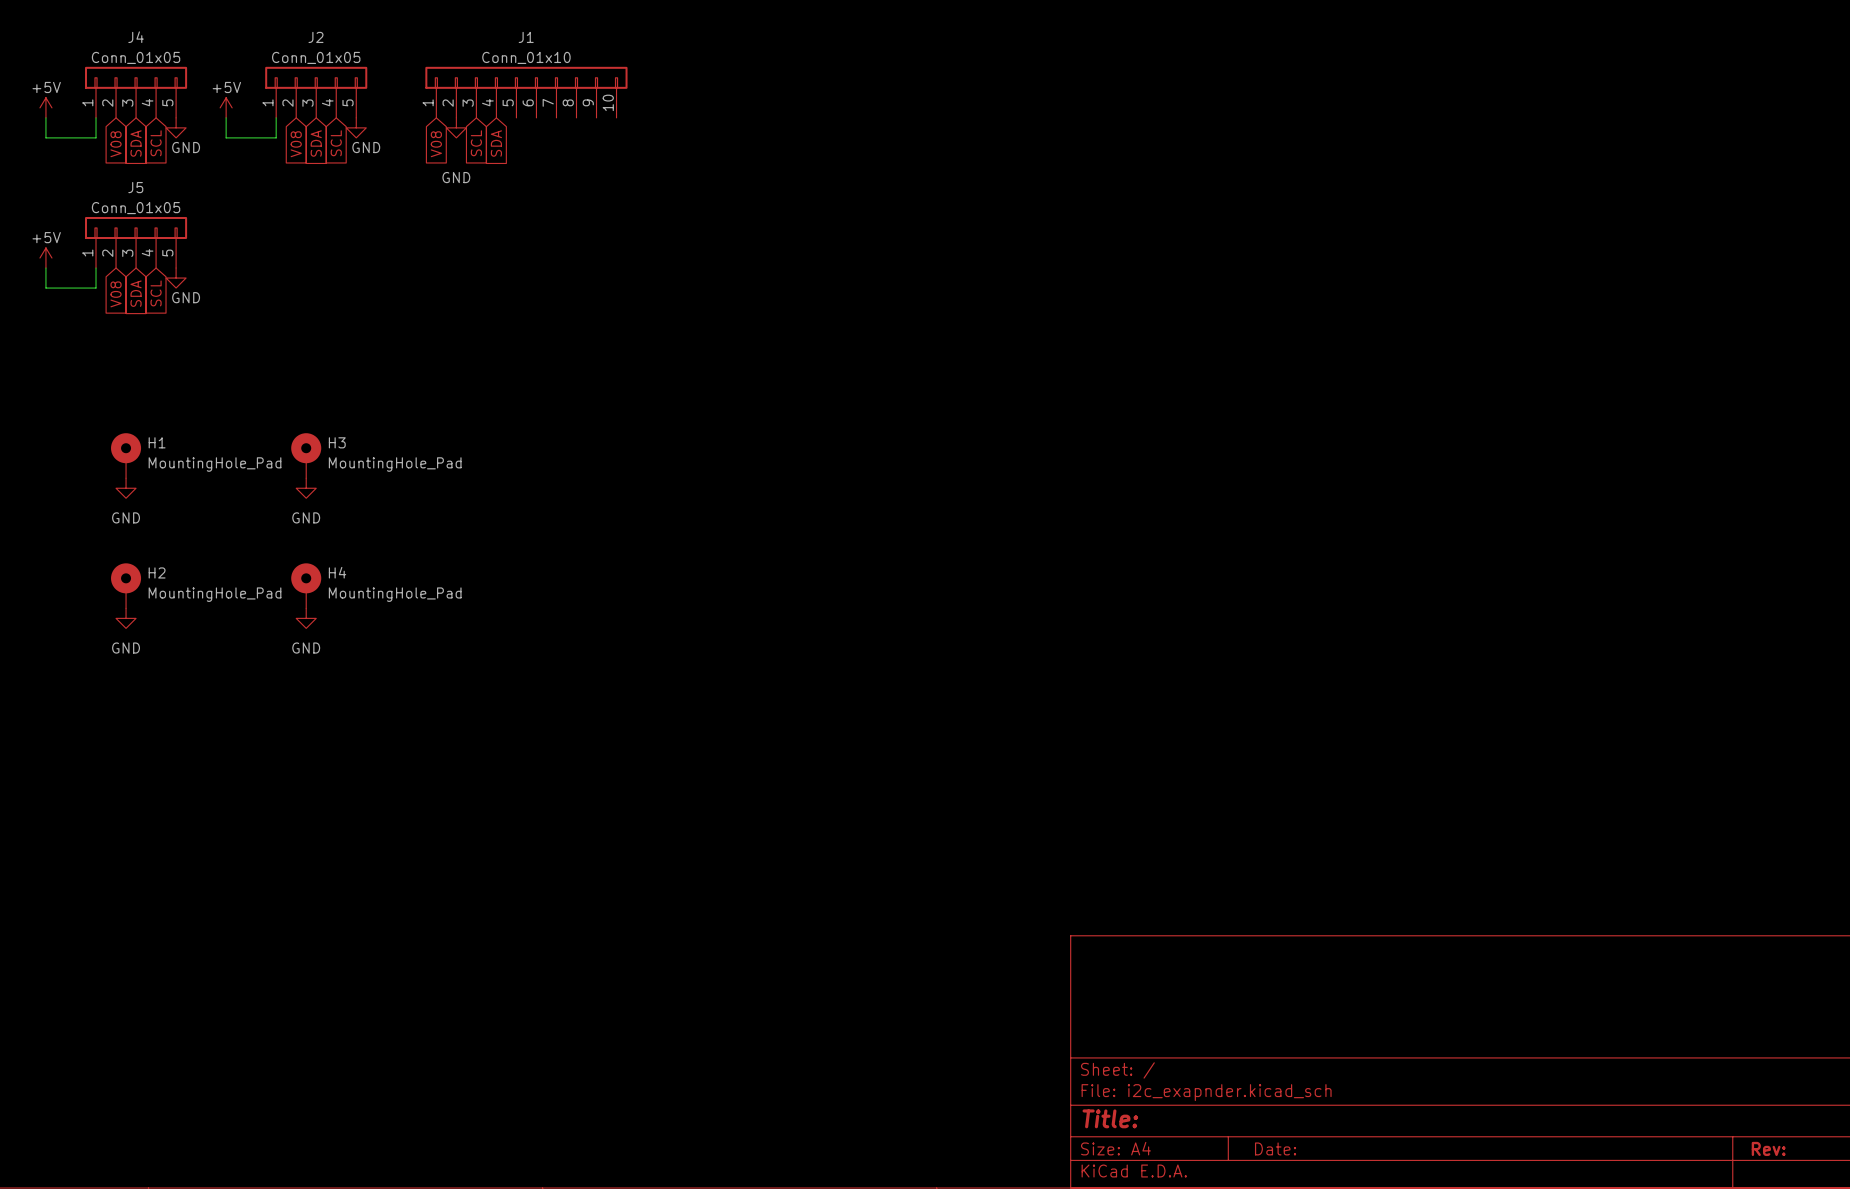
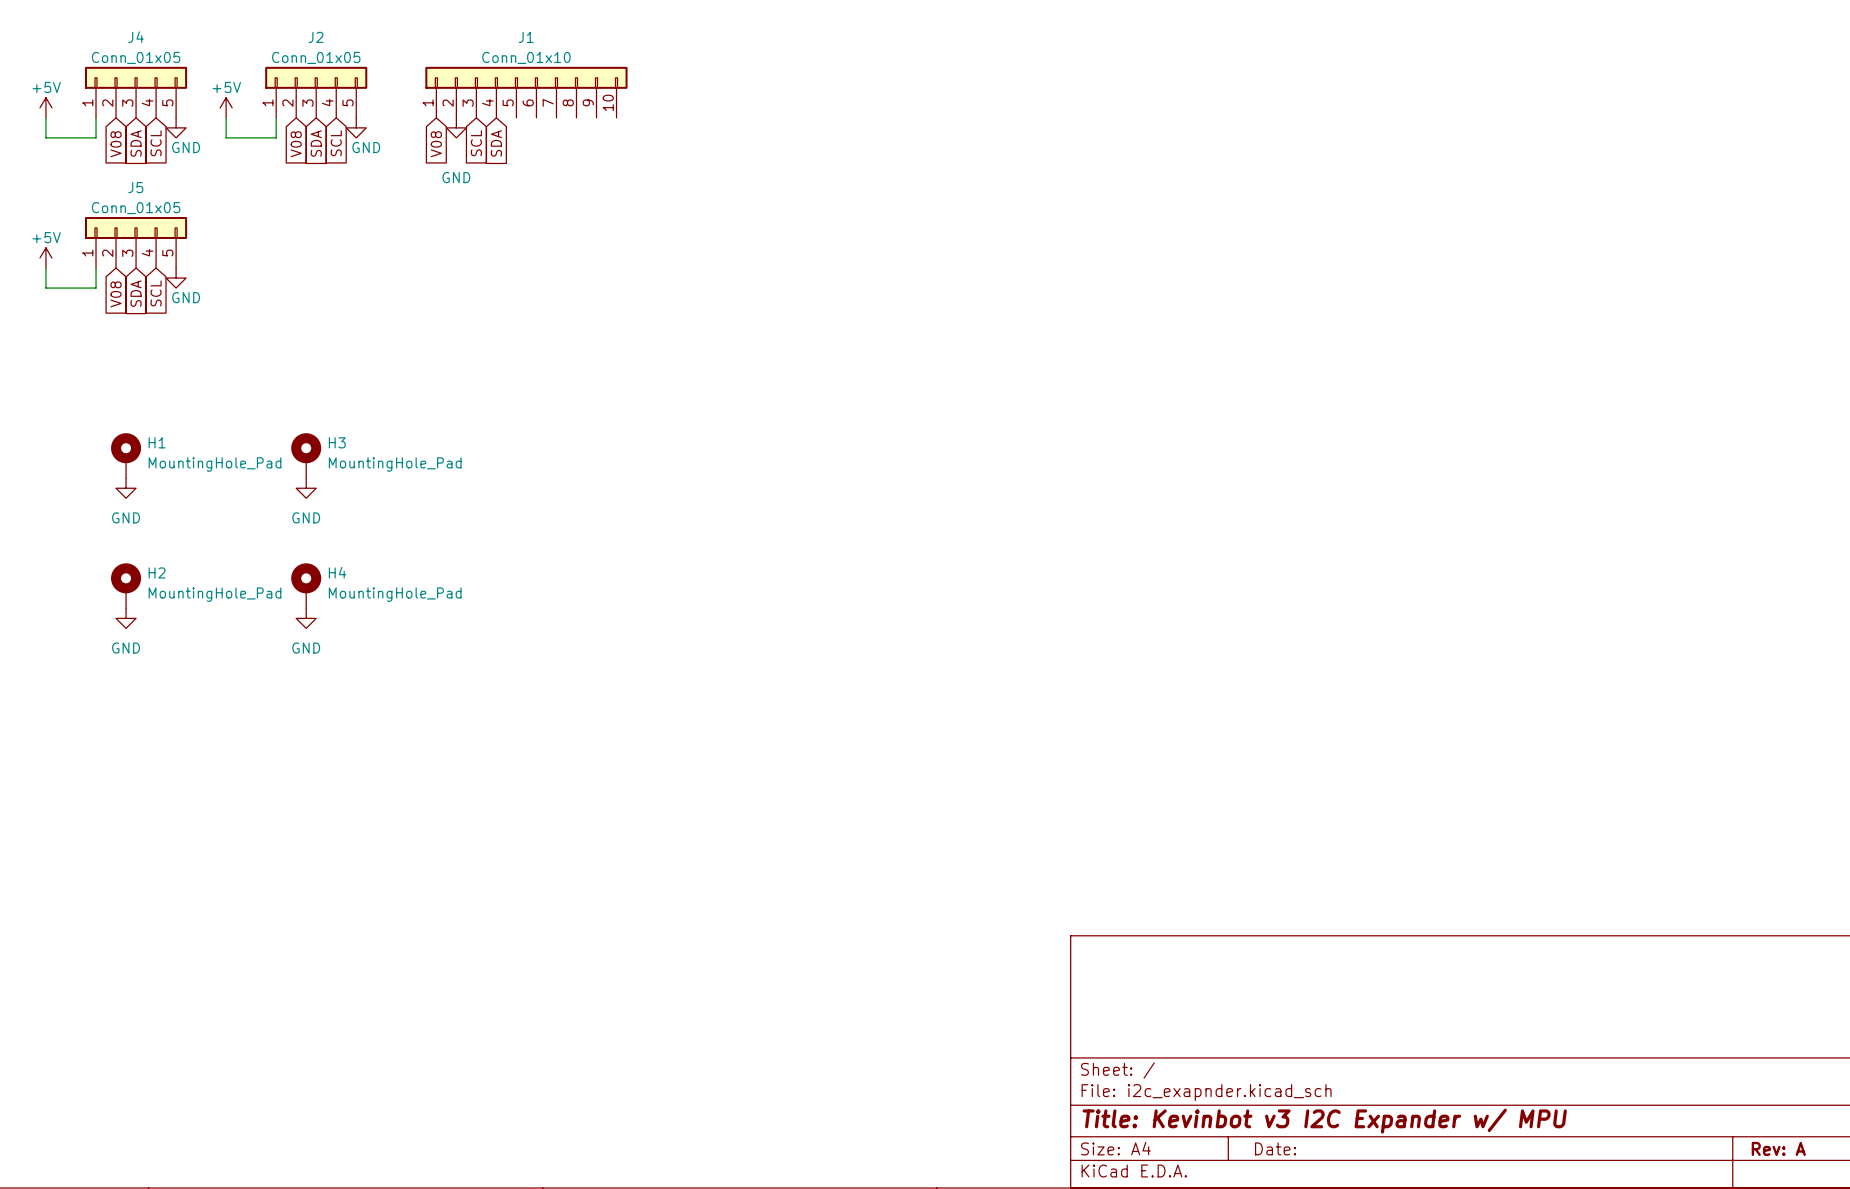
title block: Title: (1110, 1118) -> Title: Kevinbot v3 I2C Expander w/ MPU (1324, 1121)
title block: Rev: (1768, 1148) -> Rev: A (1778, 1148)

